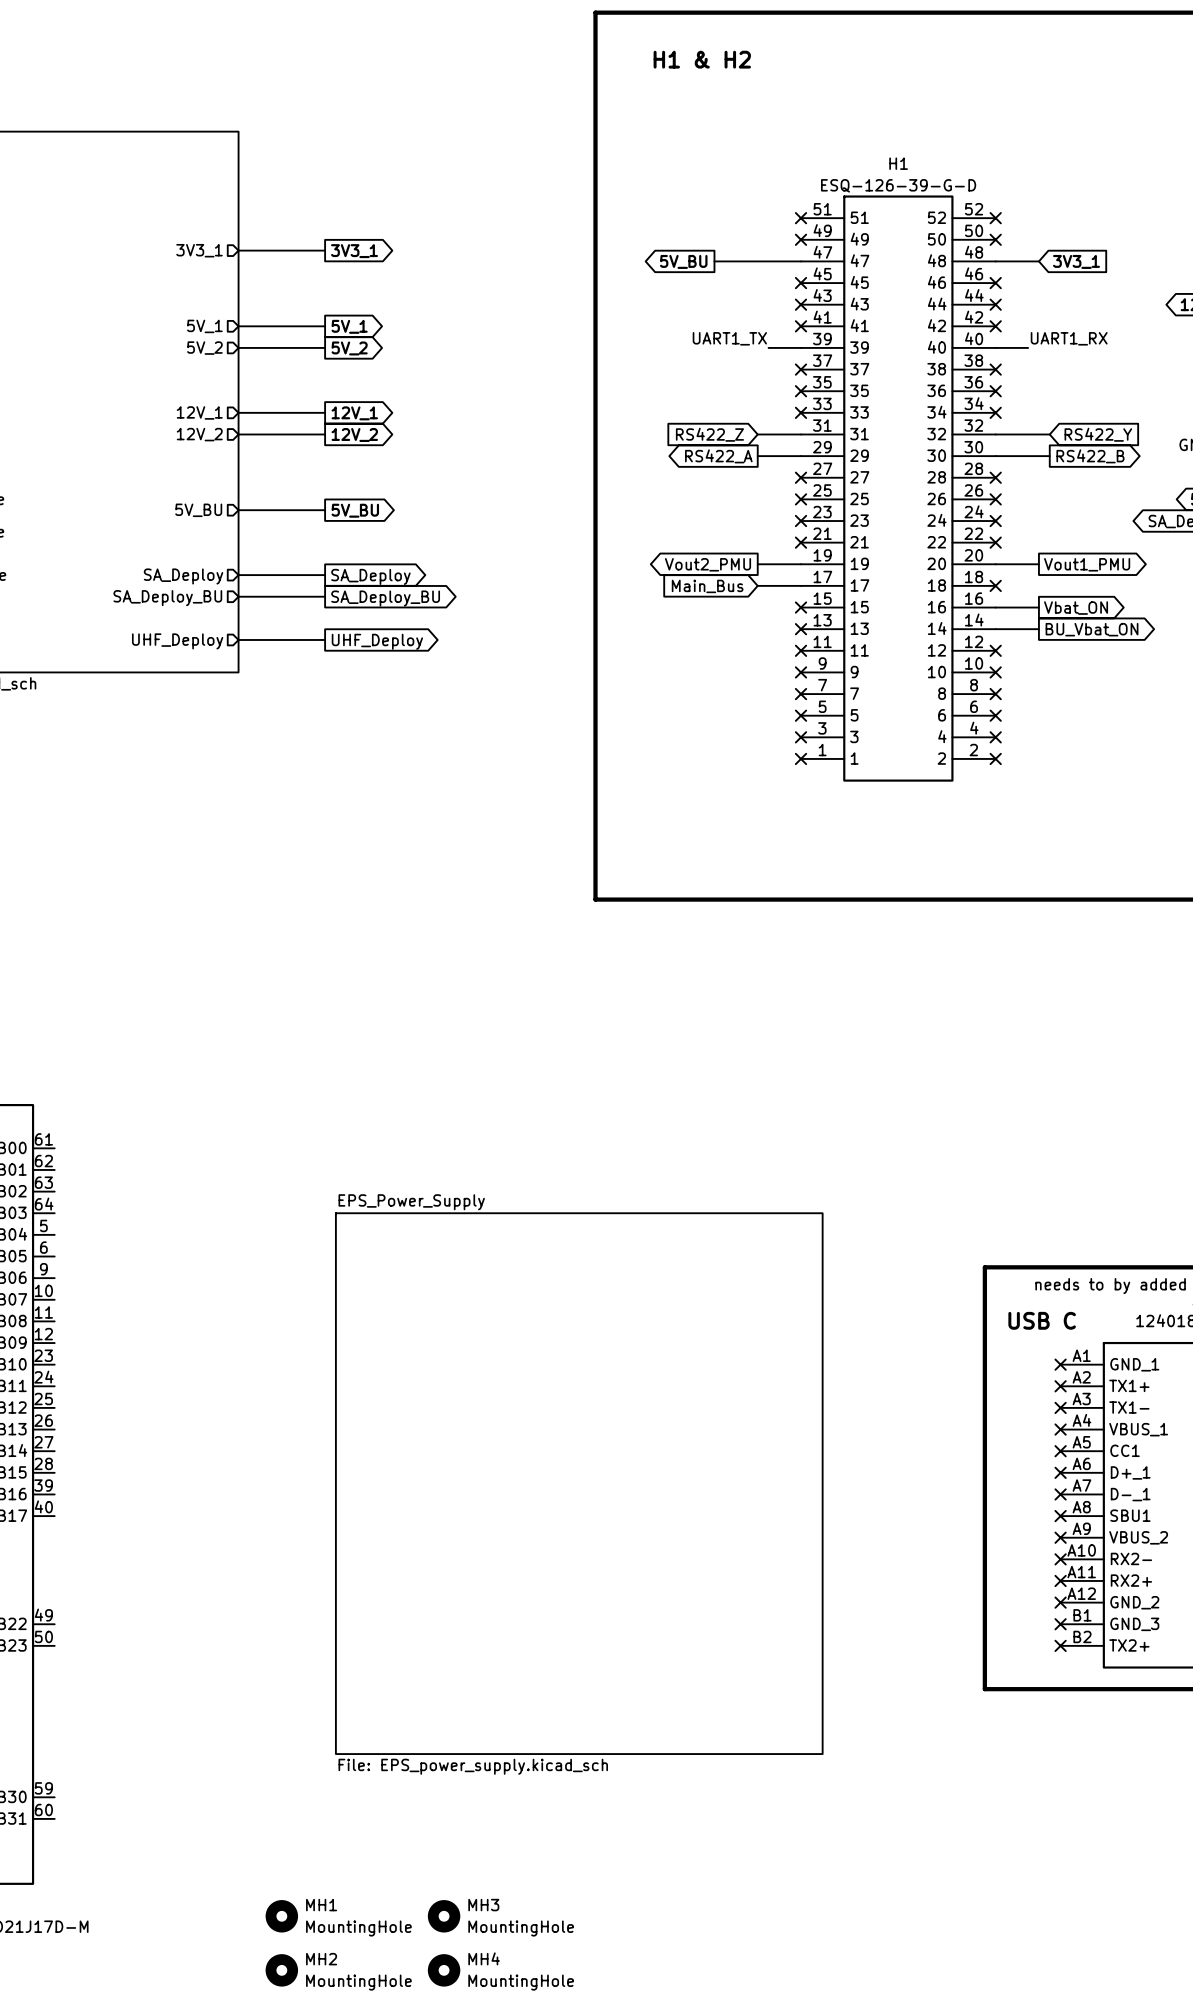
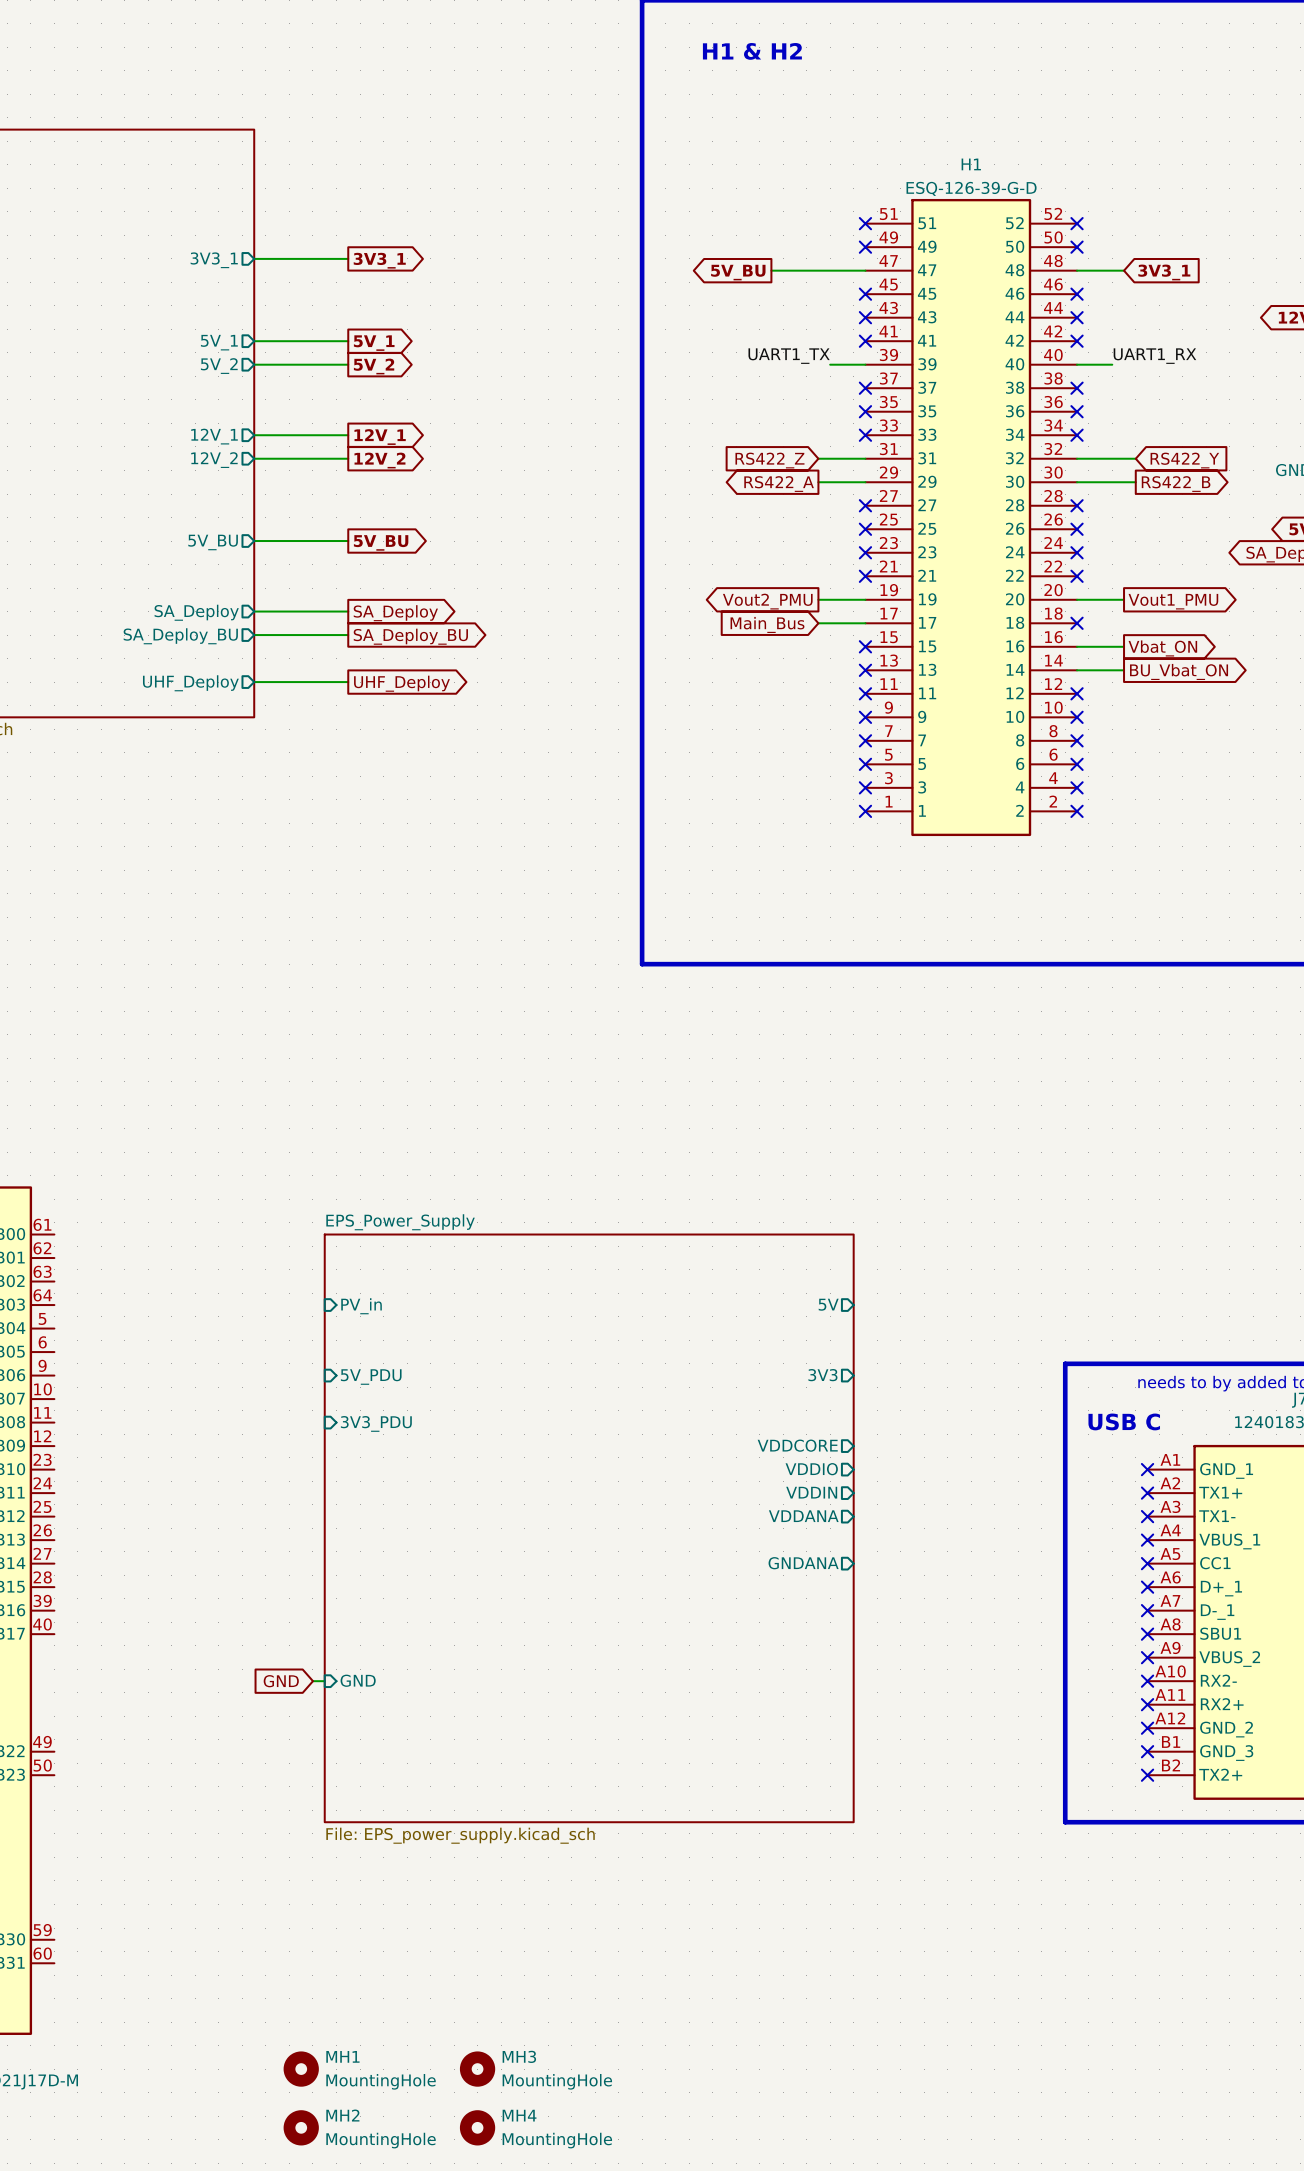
sheet pin: none -> 5V (828, 1304)
sheet pin: none -> PV_in (361, 1306)
sheet pin: none -> 3V3 (822, 1375)
sheet pin: none -> 5V_PDU (371, 1377)
sheet pin: none -> 3V3_PDU (376, 1423)
sheet pin: none -> VDDCORE (797, 1445)
sheet pin: none -> VDDIO (811, 1469)
sheet pin: none -> VDDIN (811, 1492)
sheet pin: none -> VDDANA (803, 1516)
sheet pin: none -> GNDANA (803, 1563)
sheet EPS_Power_Supply position: (579, 1483) -> (589, 1528)
sheet pin: none -> GND (358, 1680)
global label: none -> GND (281, 1681)
wire: none -> (312, 1681) (324, 1681)

